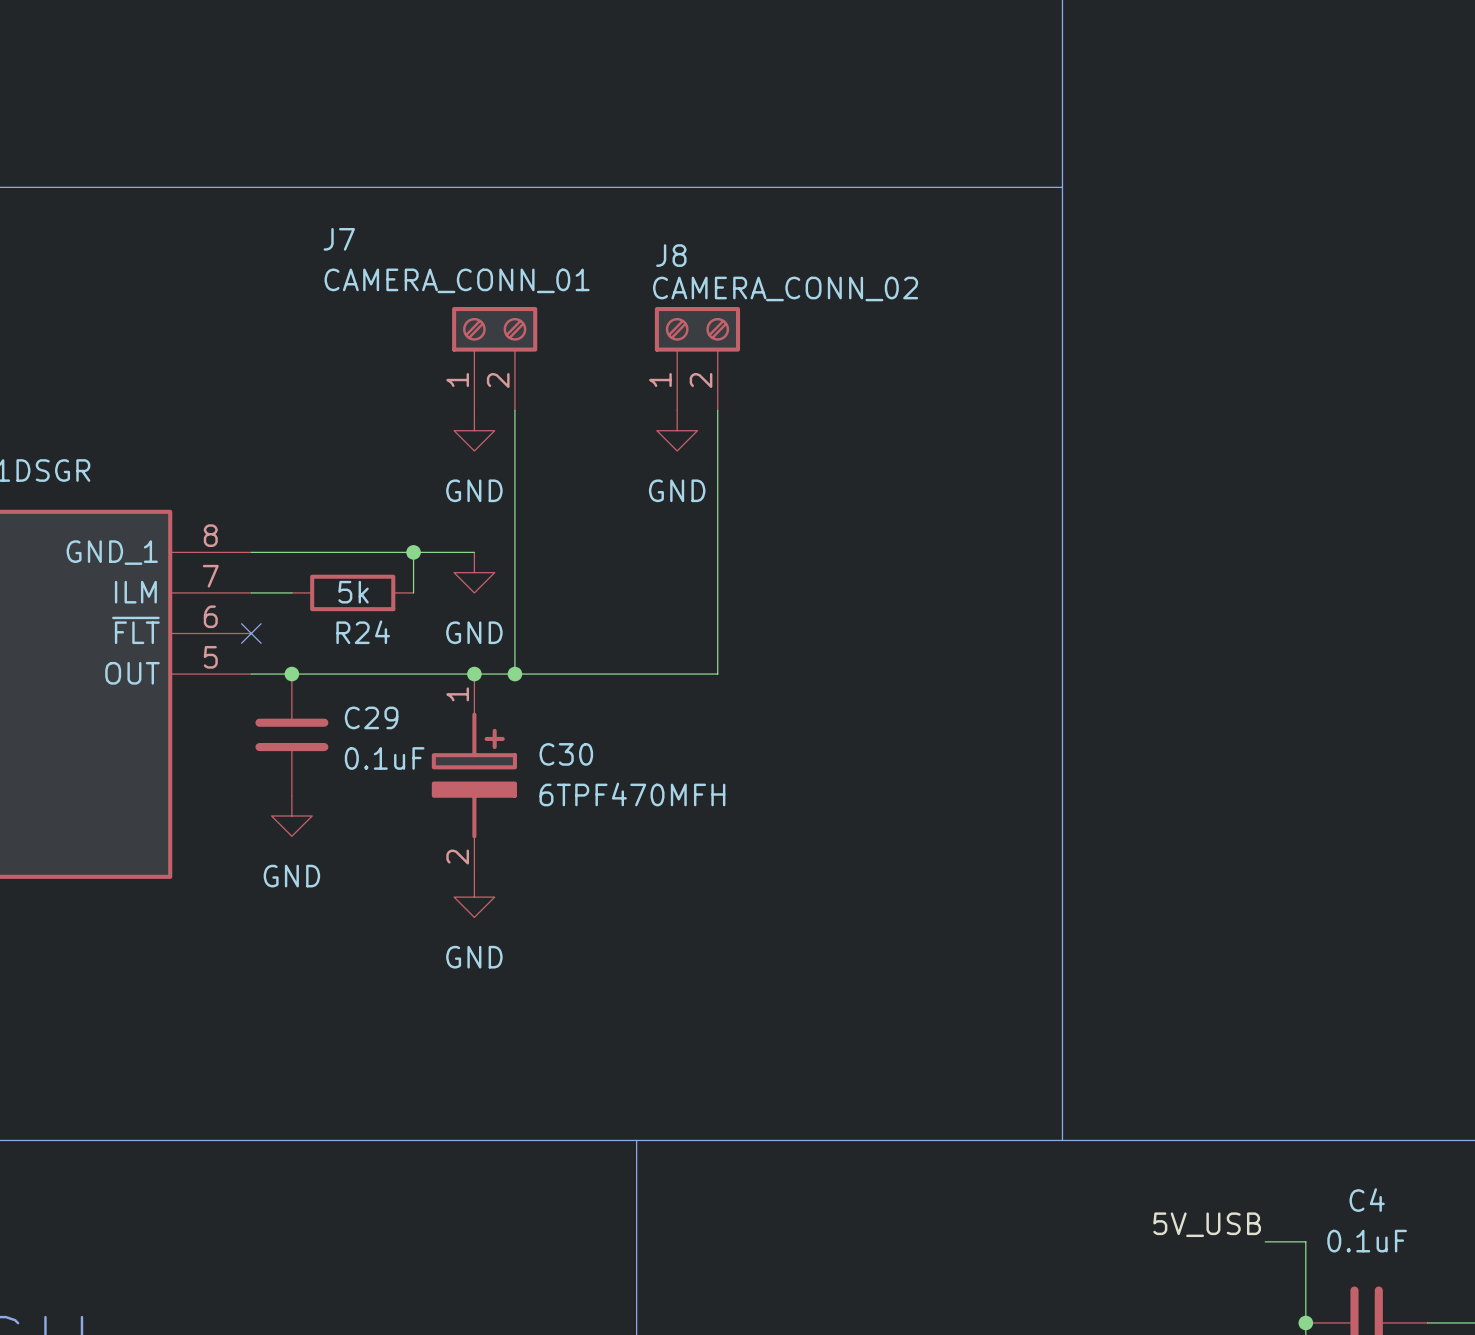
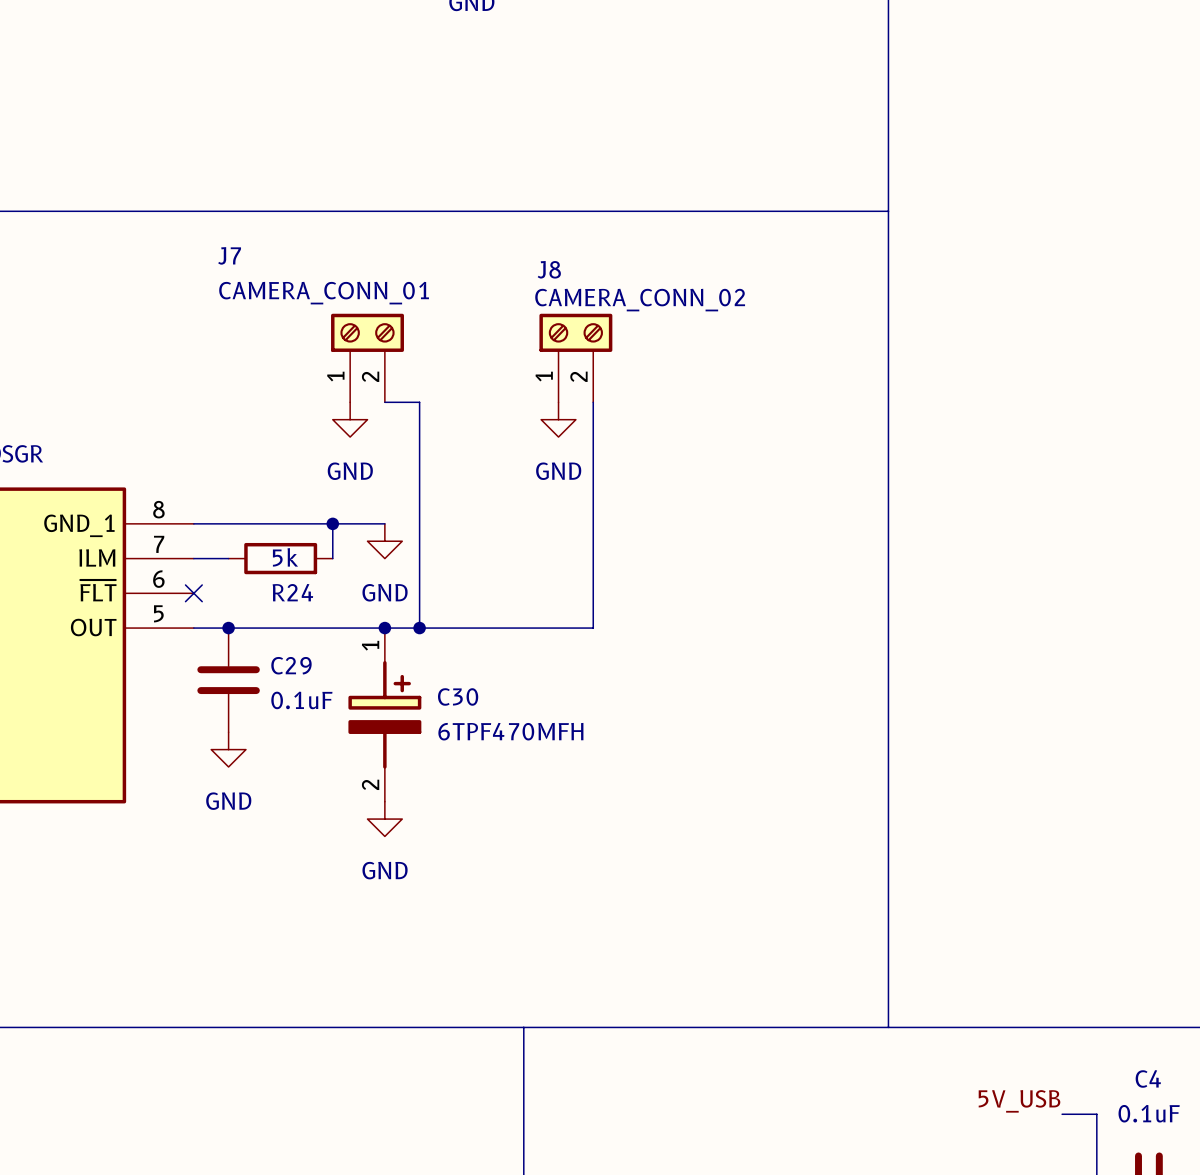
J7 position: (494, 358) -> (367, 358)
wire: none -> (384, 402) (419, 402)
power symbol position: GND (474, 430) -> GND (350, 419)

